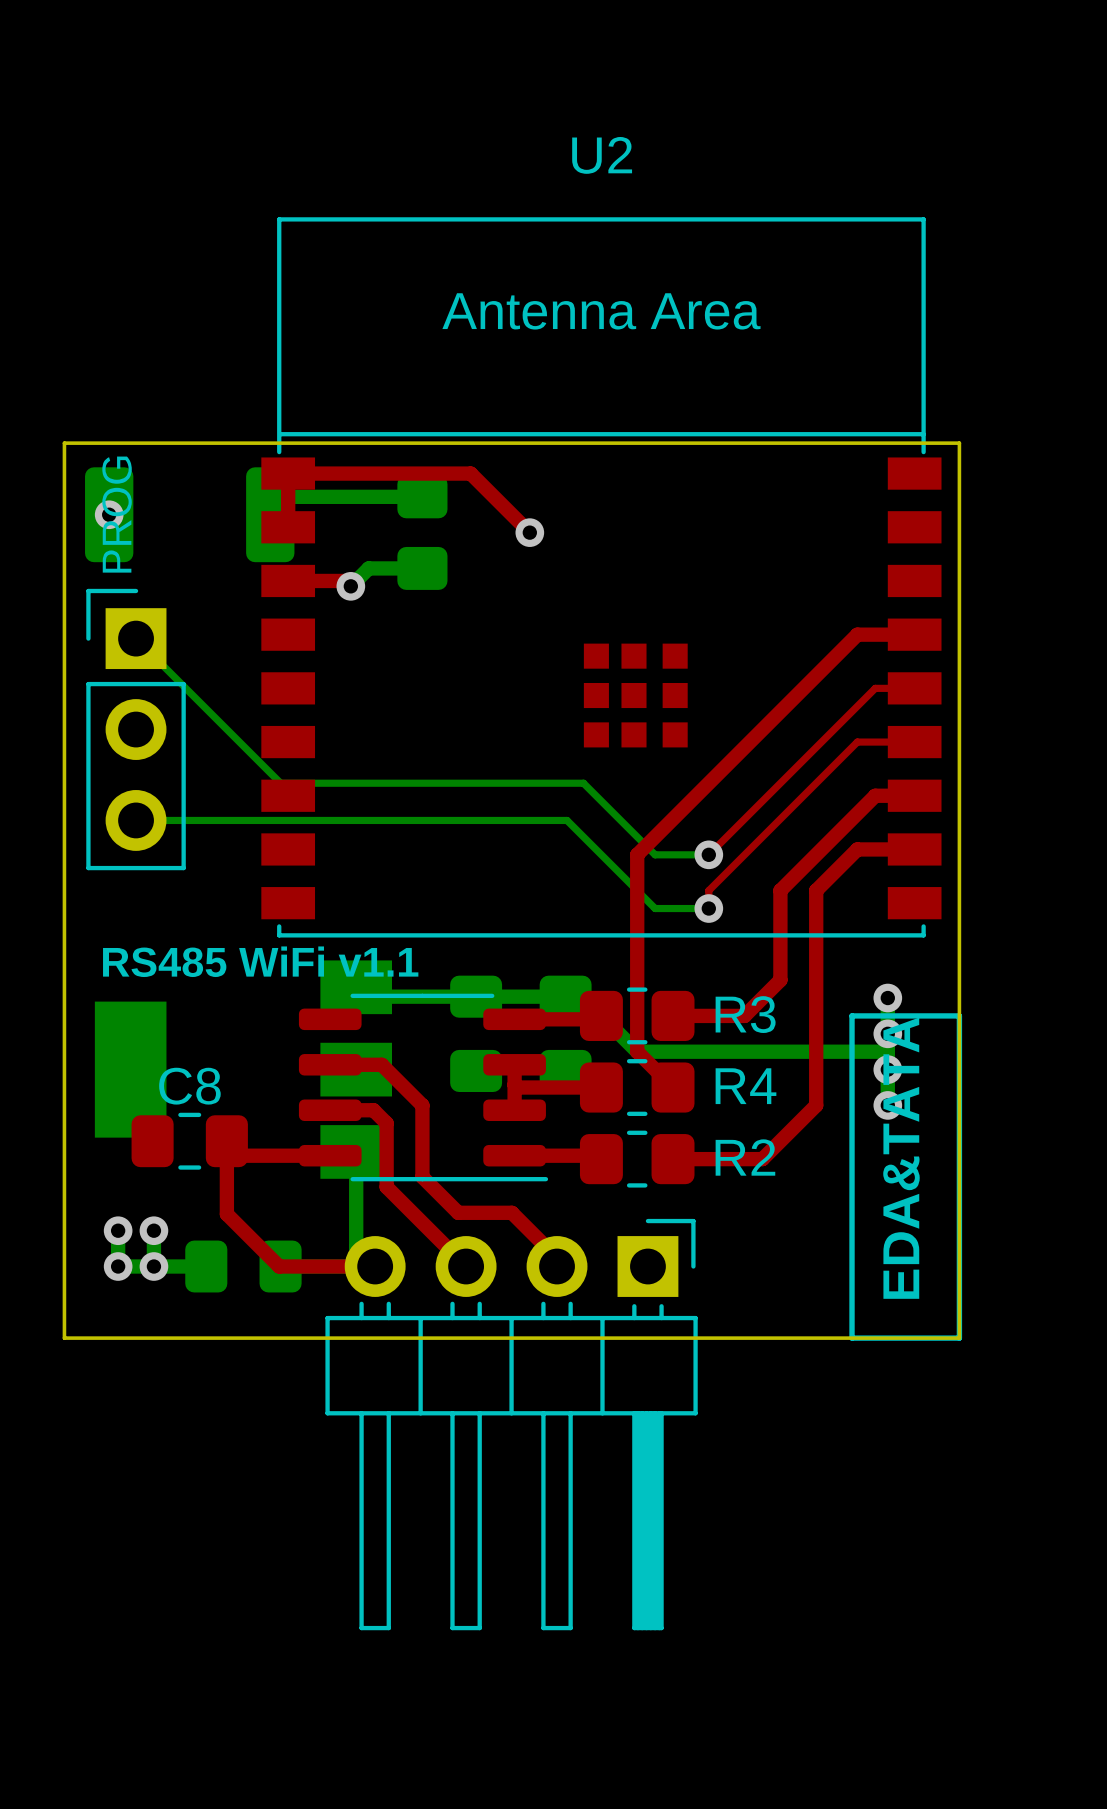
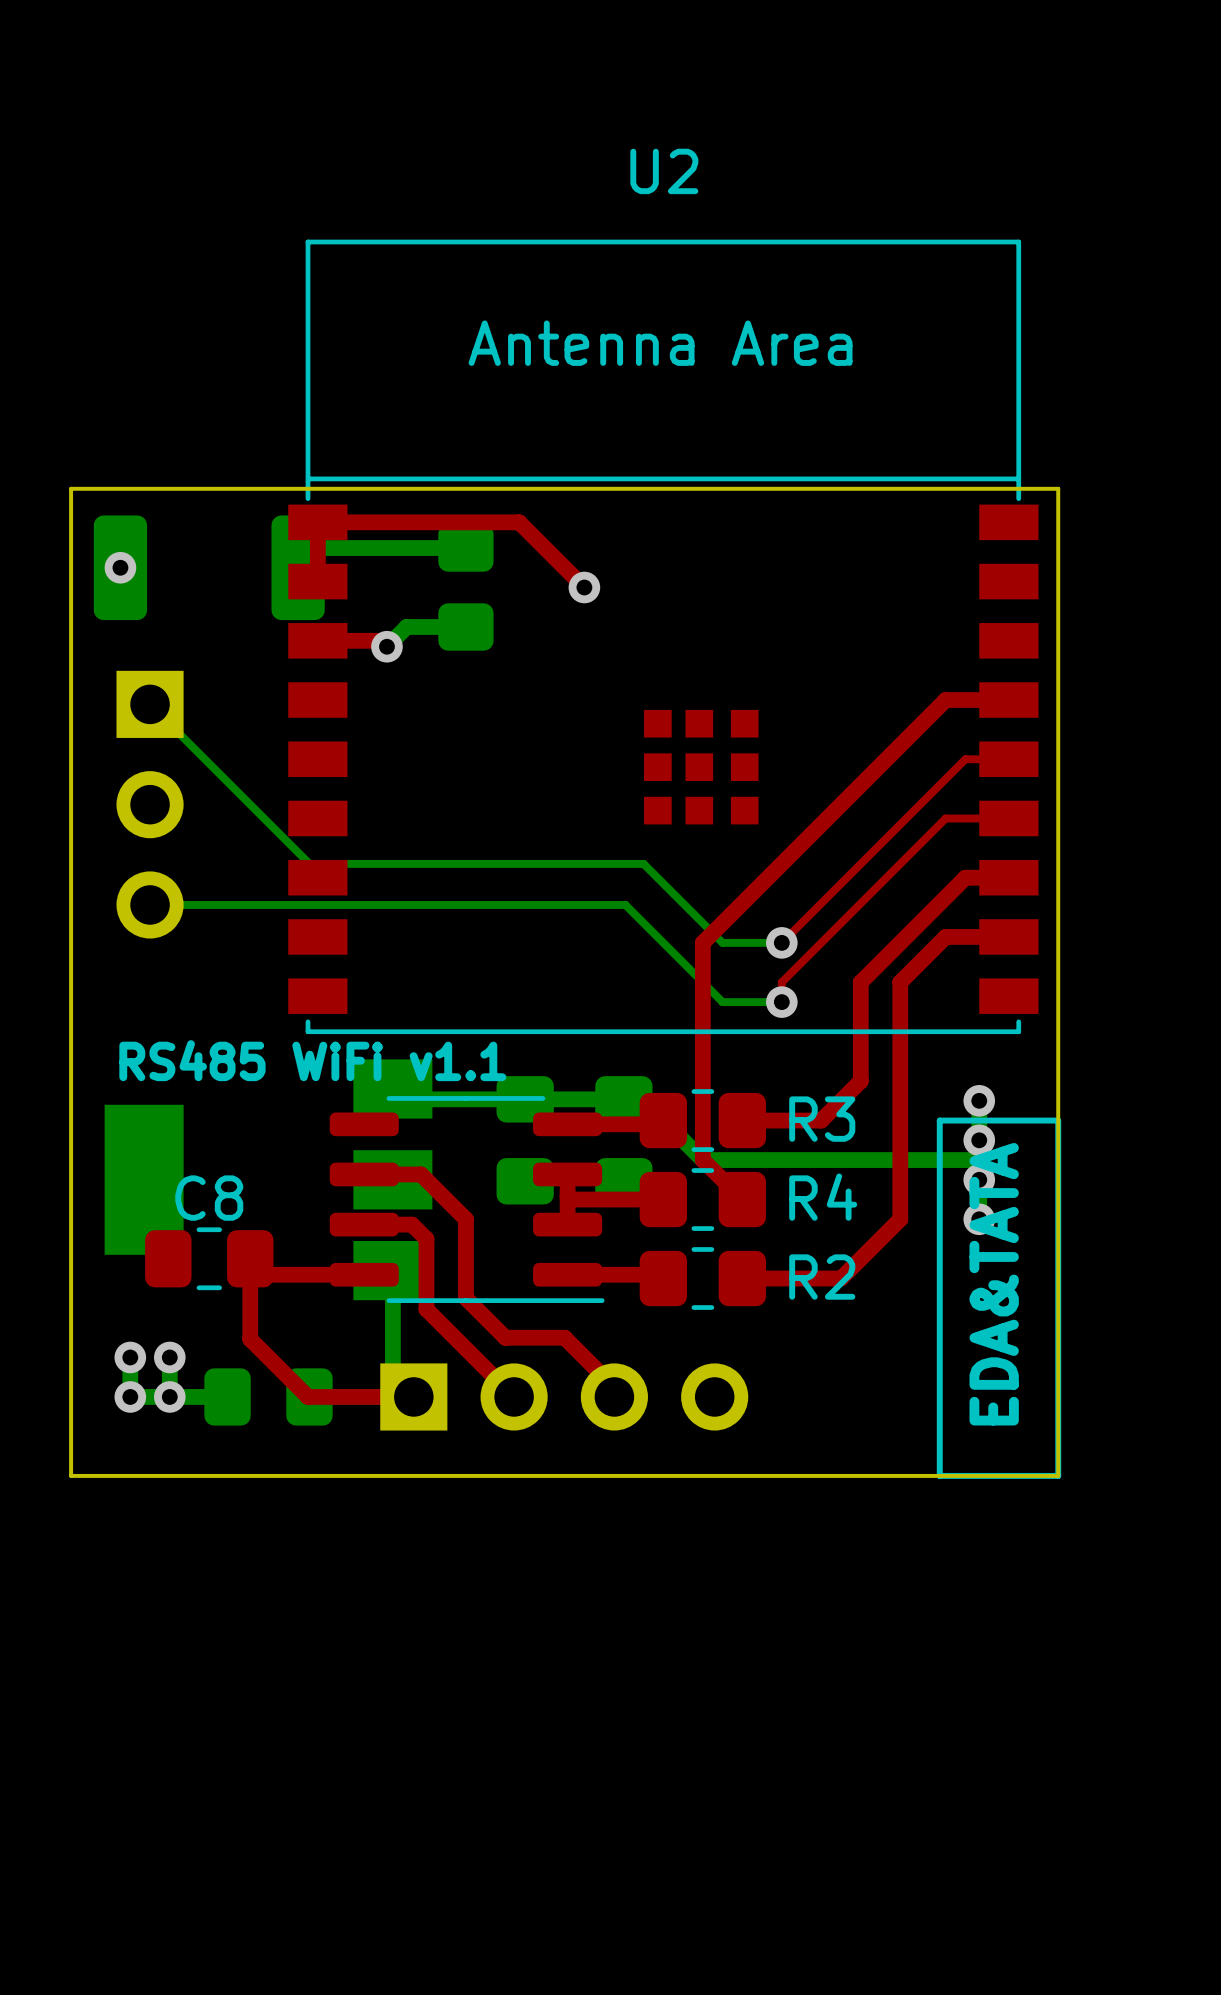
part side: top (136, 729) -> bottom (150, 804)
part side: top (511, 1424) -> bottom (564, 1396)

